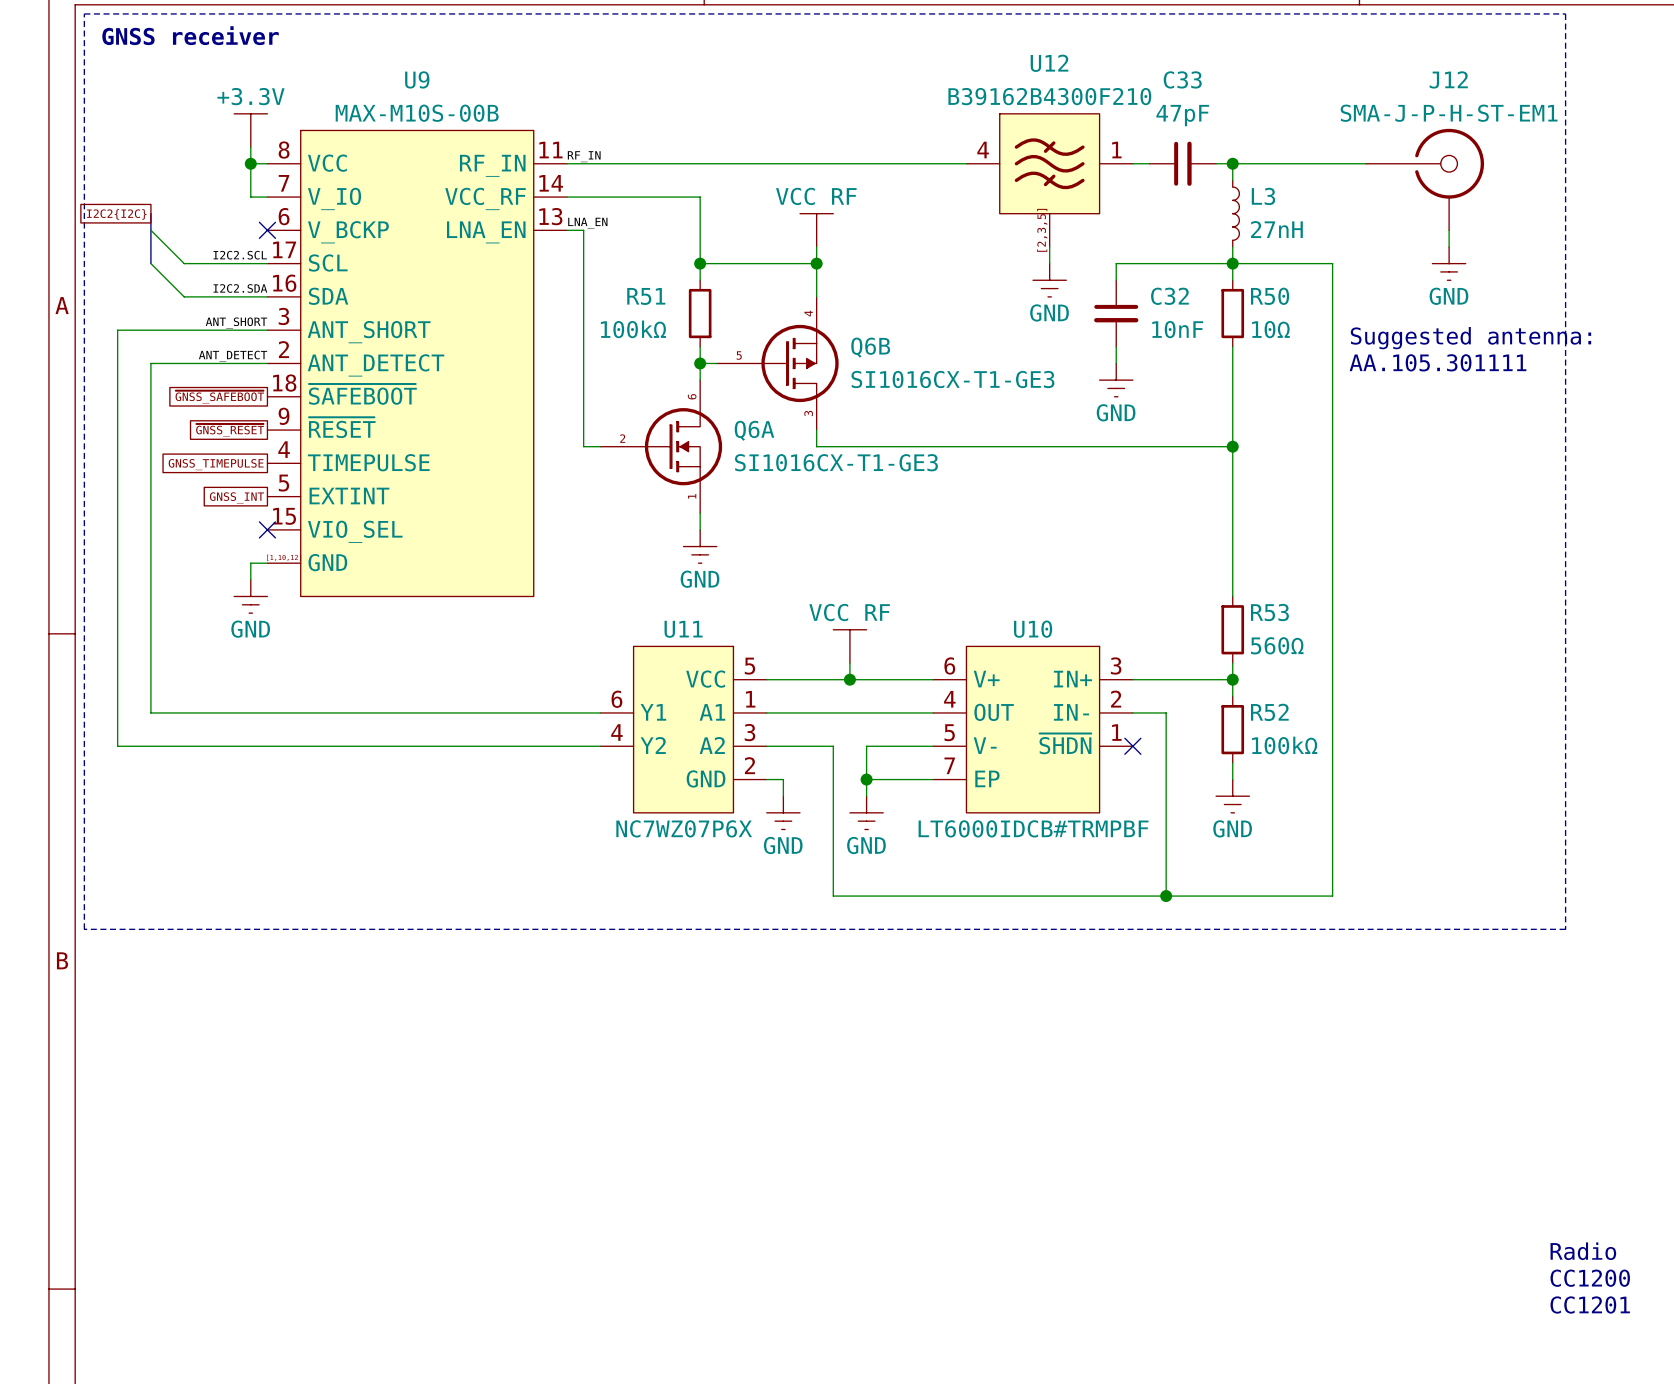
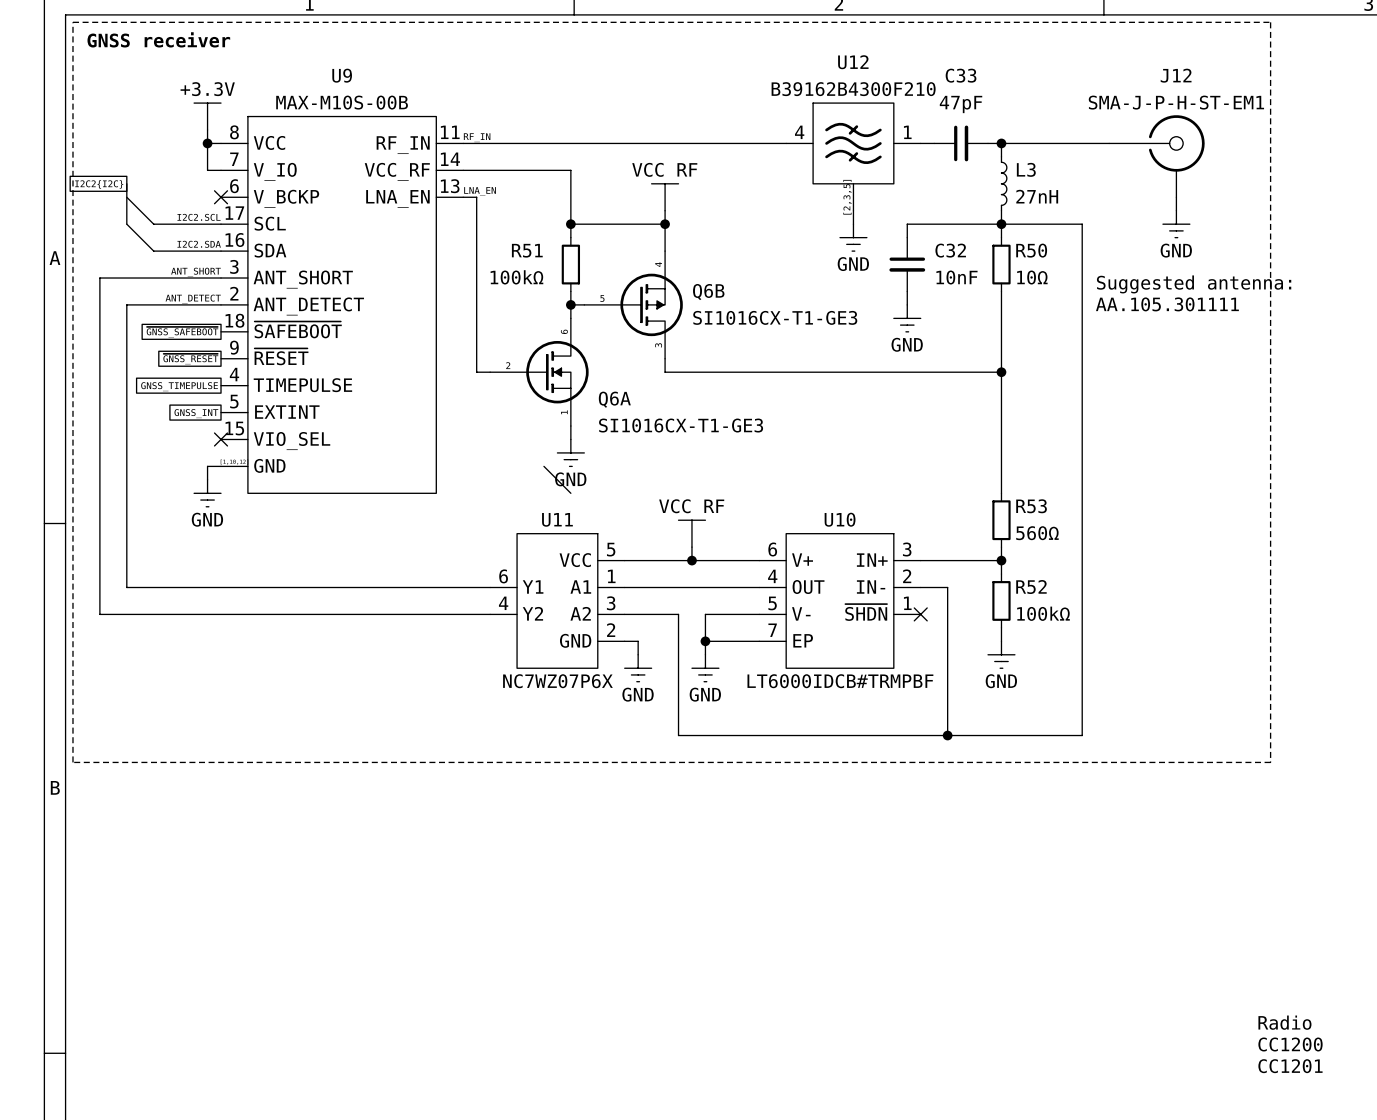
Q6A name position: Q6A (754, 430) -> Q6A (614, 399)
Q6A value position: SI1016CX-T1-GE3 (836, 462) -> SI1016CX-T1-GE3 (681, 425)
wire: none -> (543, 466) (570, 493)

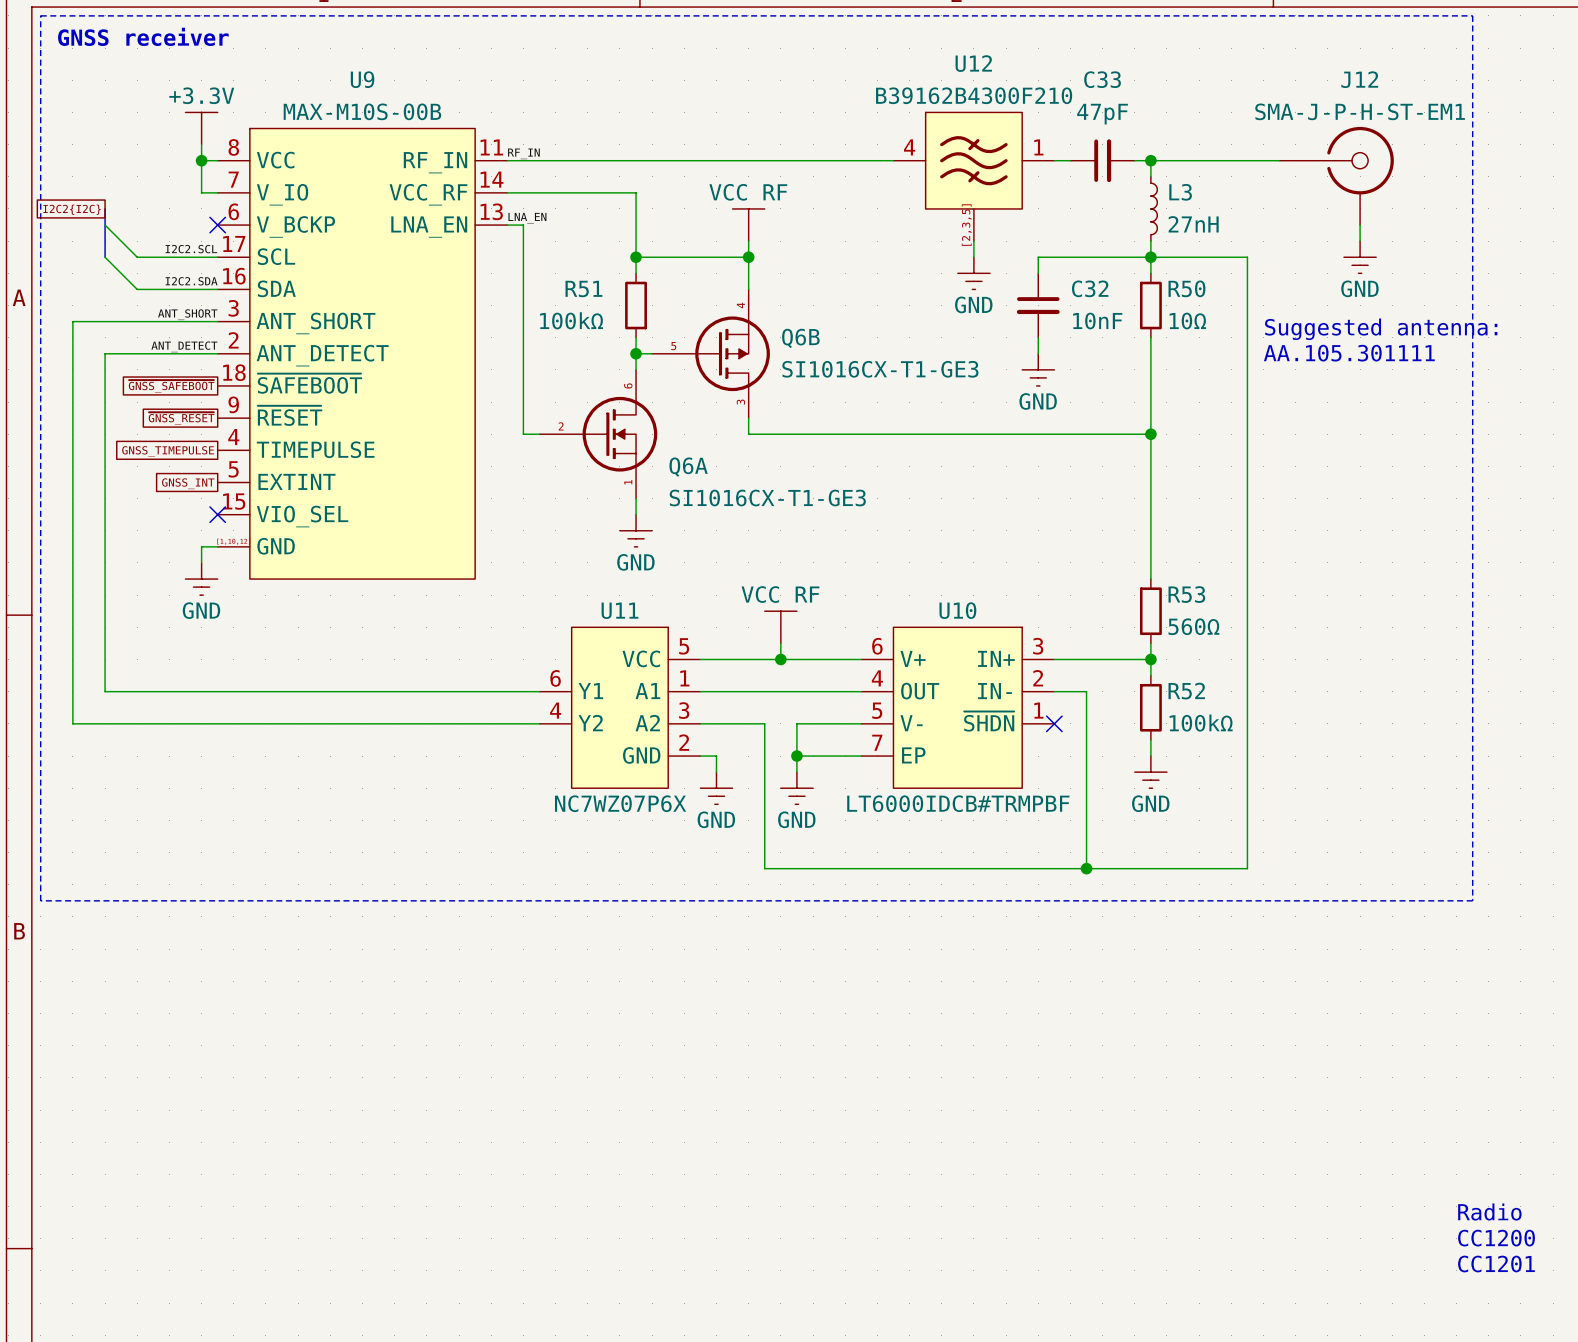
wire: (543, 466) (570, 493) -> none

